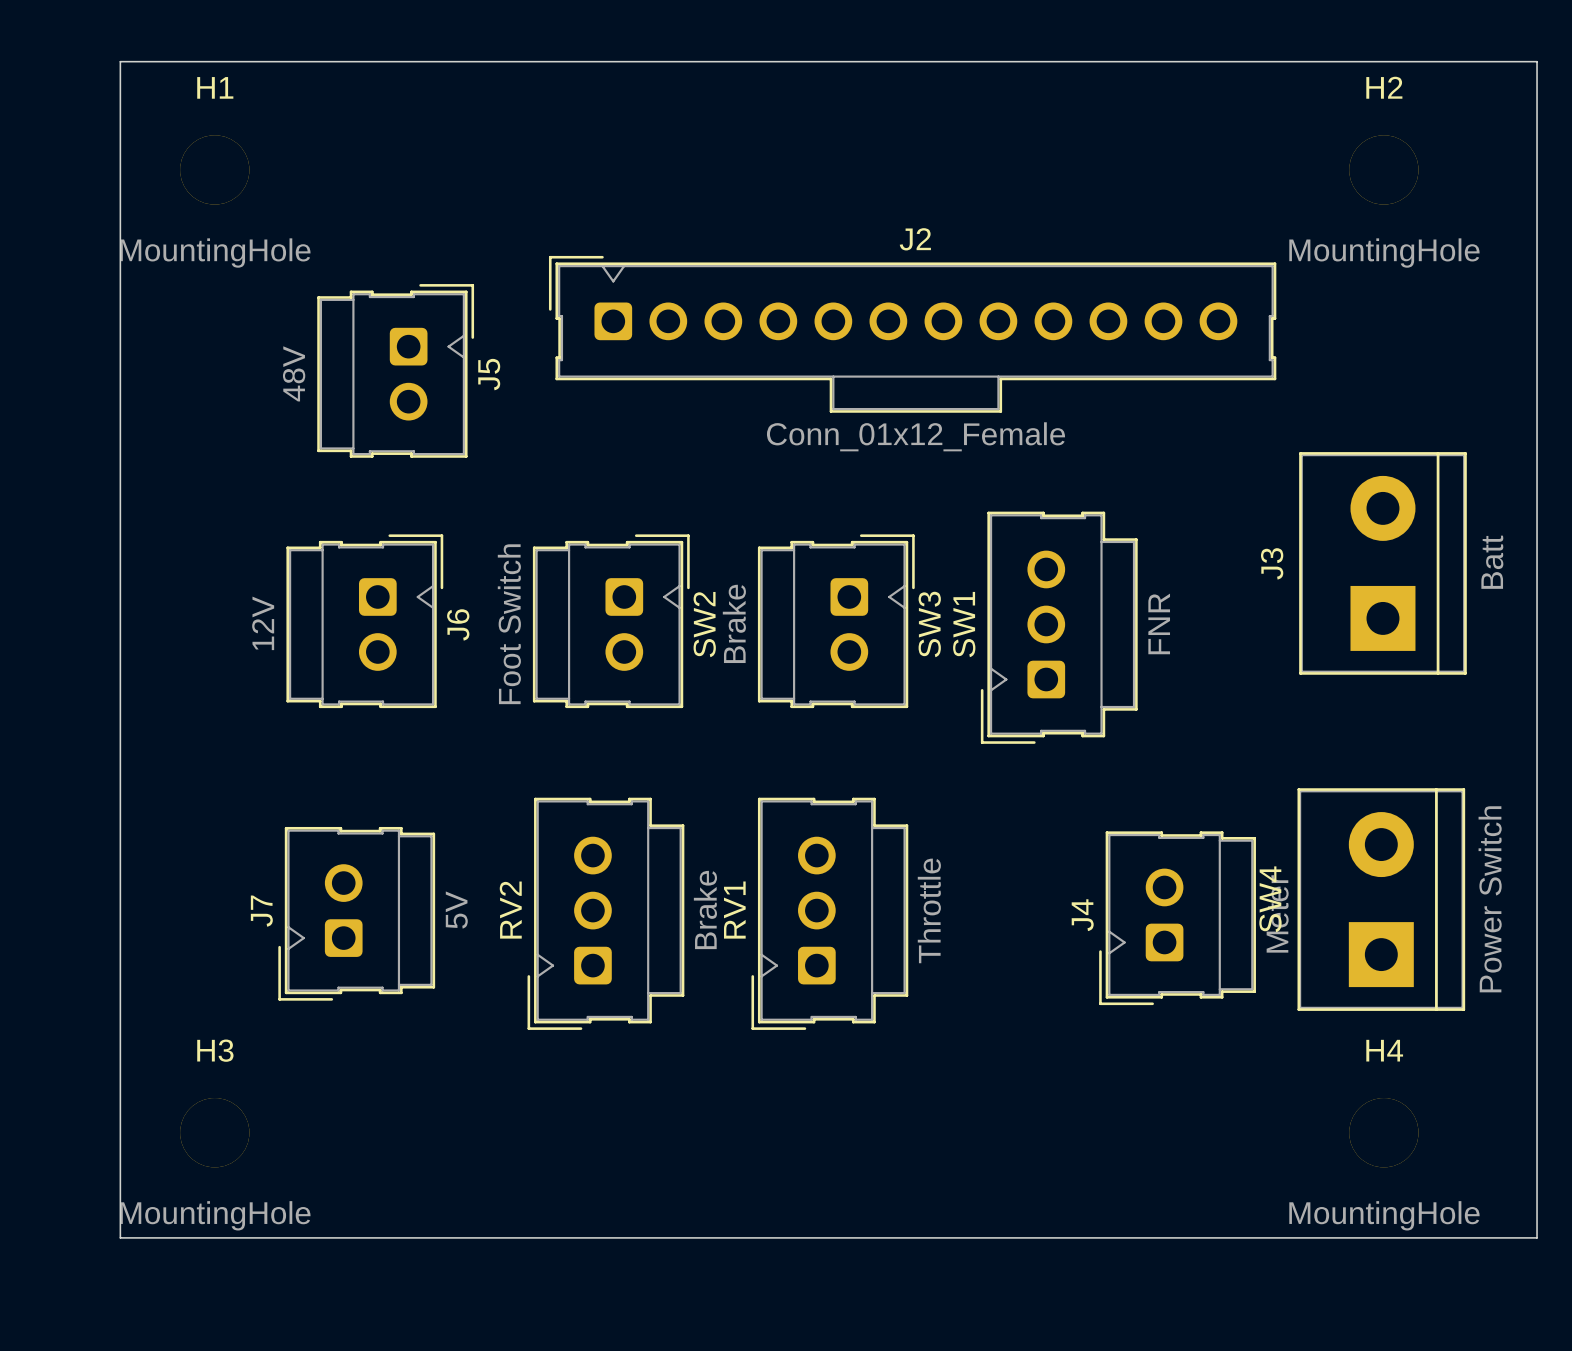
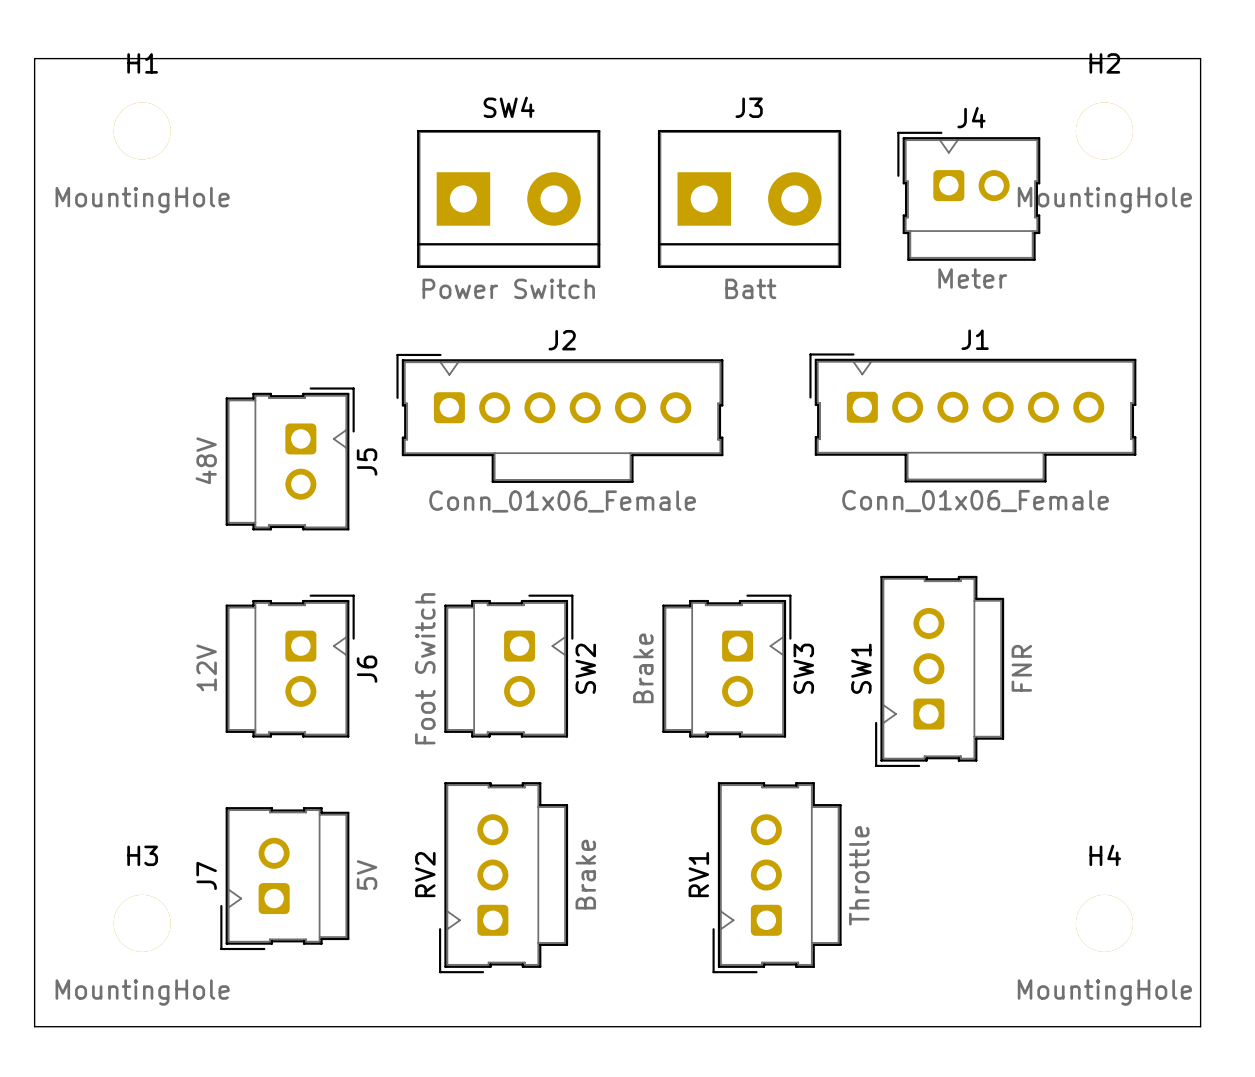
board edge: (120, 61) (120, 1237) (1537, 1237) (1537, 61) (120, 61) -> (34, 58) (34, 1026) (1200, 1026) (1200, 58) (34, 58)
J2 footprint: [548, 255, 1277, 413] -> [396, 353, 724, 483]
J5 position: (395, 370) -> (290, 458)
J2 value: Conn_01x12_Female (915, 436) -> Conn_01x06_Female (562, 501)
J1: none -> Conn_01x06_Female (972, 417)
J3 rotation: 0° (1382, 563) -> 90° clockwise (749, 198)
J3 position: (1382, 563) -> (749, 198)
J6 position: (364, 621) -> (290, 666)
SW2 position: (611, 621) -> (508, 666)
SW3 position: (836, 621) -> (726, 666)
SW1 position: (1059, 627) -> (939, 671)
SW4 rotation: 0° (1381, 899) -> 90° clockwise (508, 198)
SW4 position: (1381, 899) -> (508, 198)
J7 position: (356, 913) -> (284, 878)
RV2 position: (605, 913) -> (503, 877)
RV1 position: (829, 913) -> (777, 877)
J4 rotation: 0° (1177, 918) -> 90° clockwise (968, 196)
J4 position: (1177, 918) -> (968, 196)

